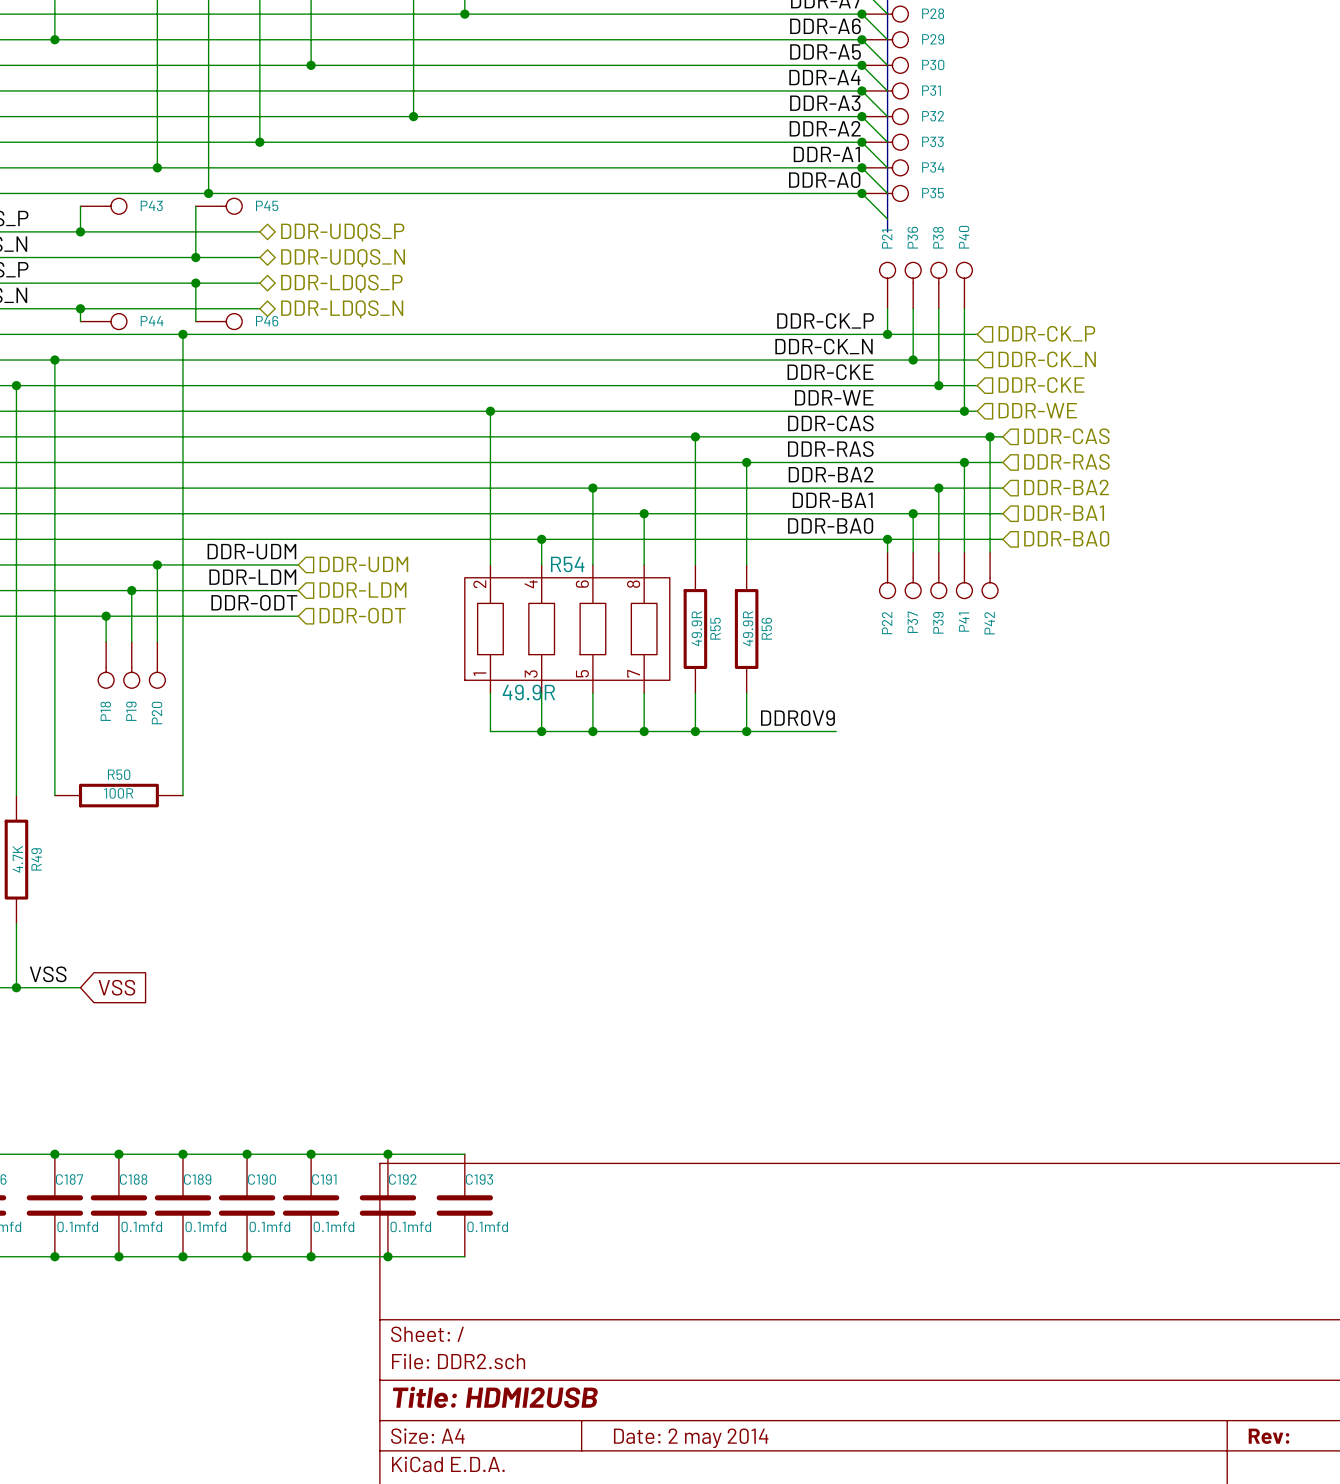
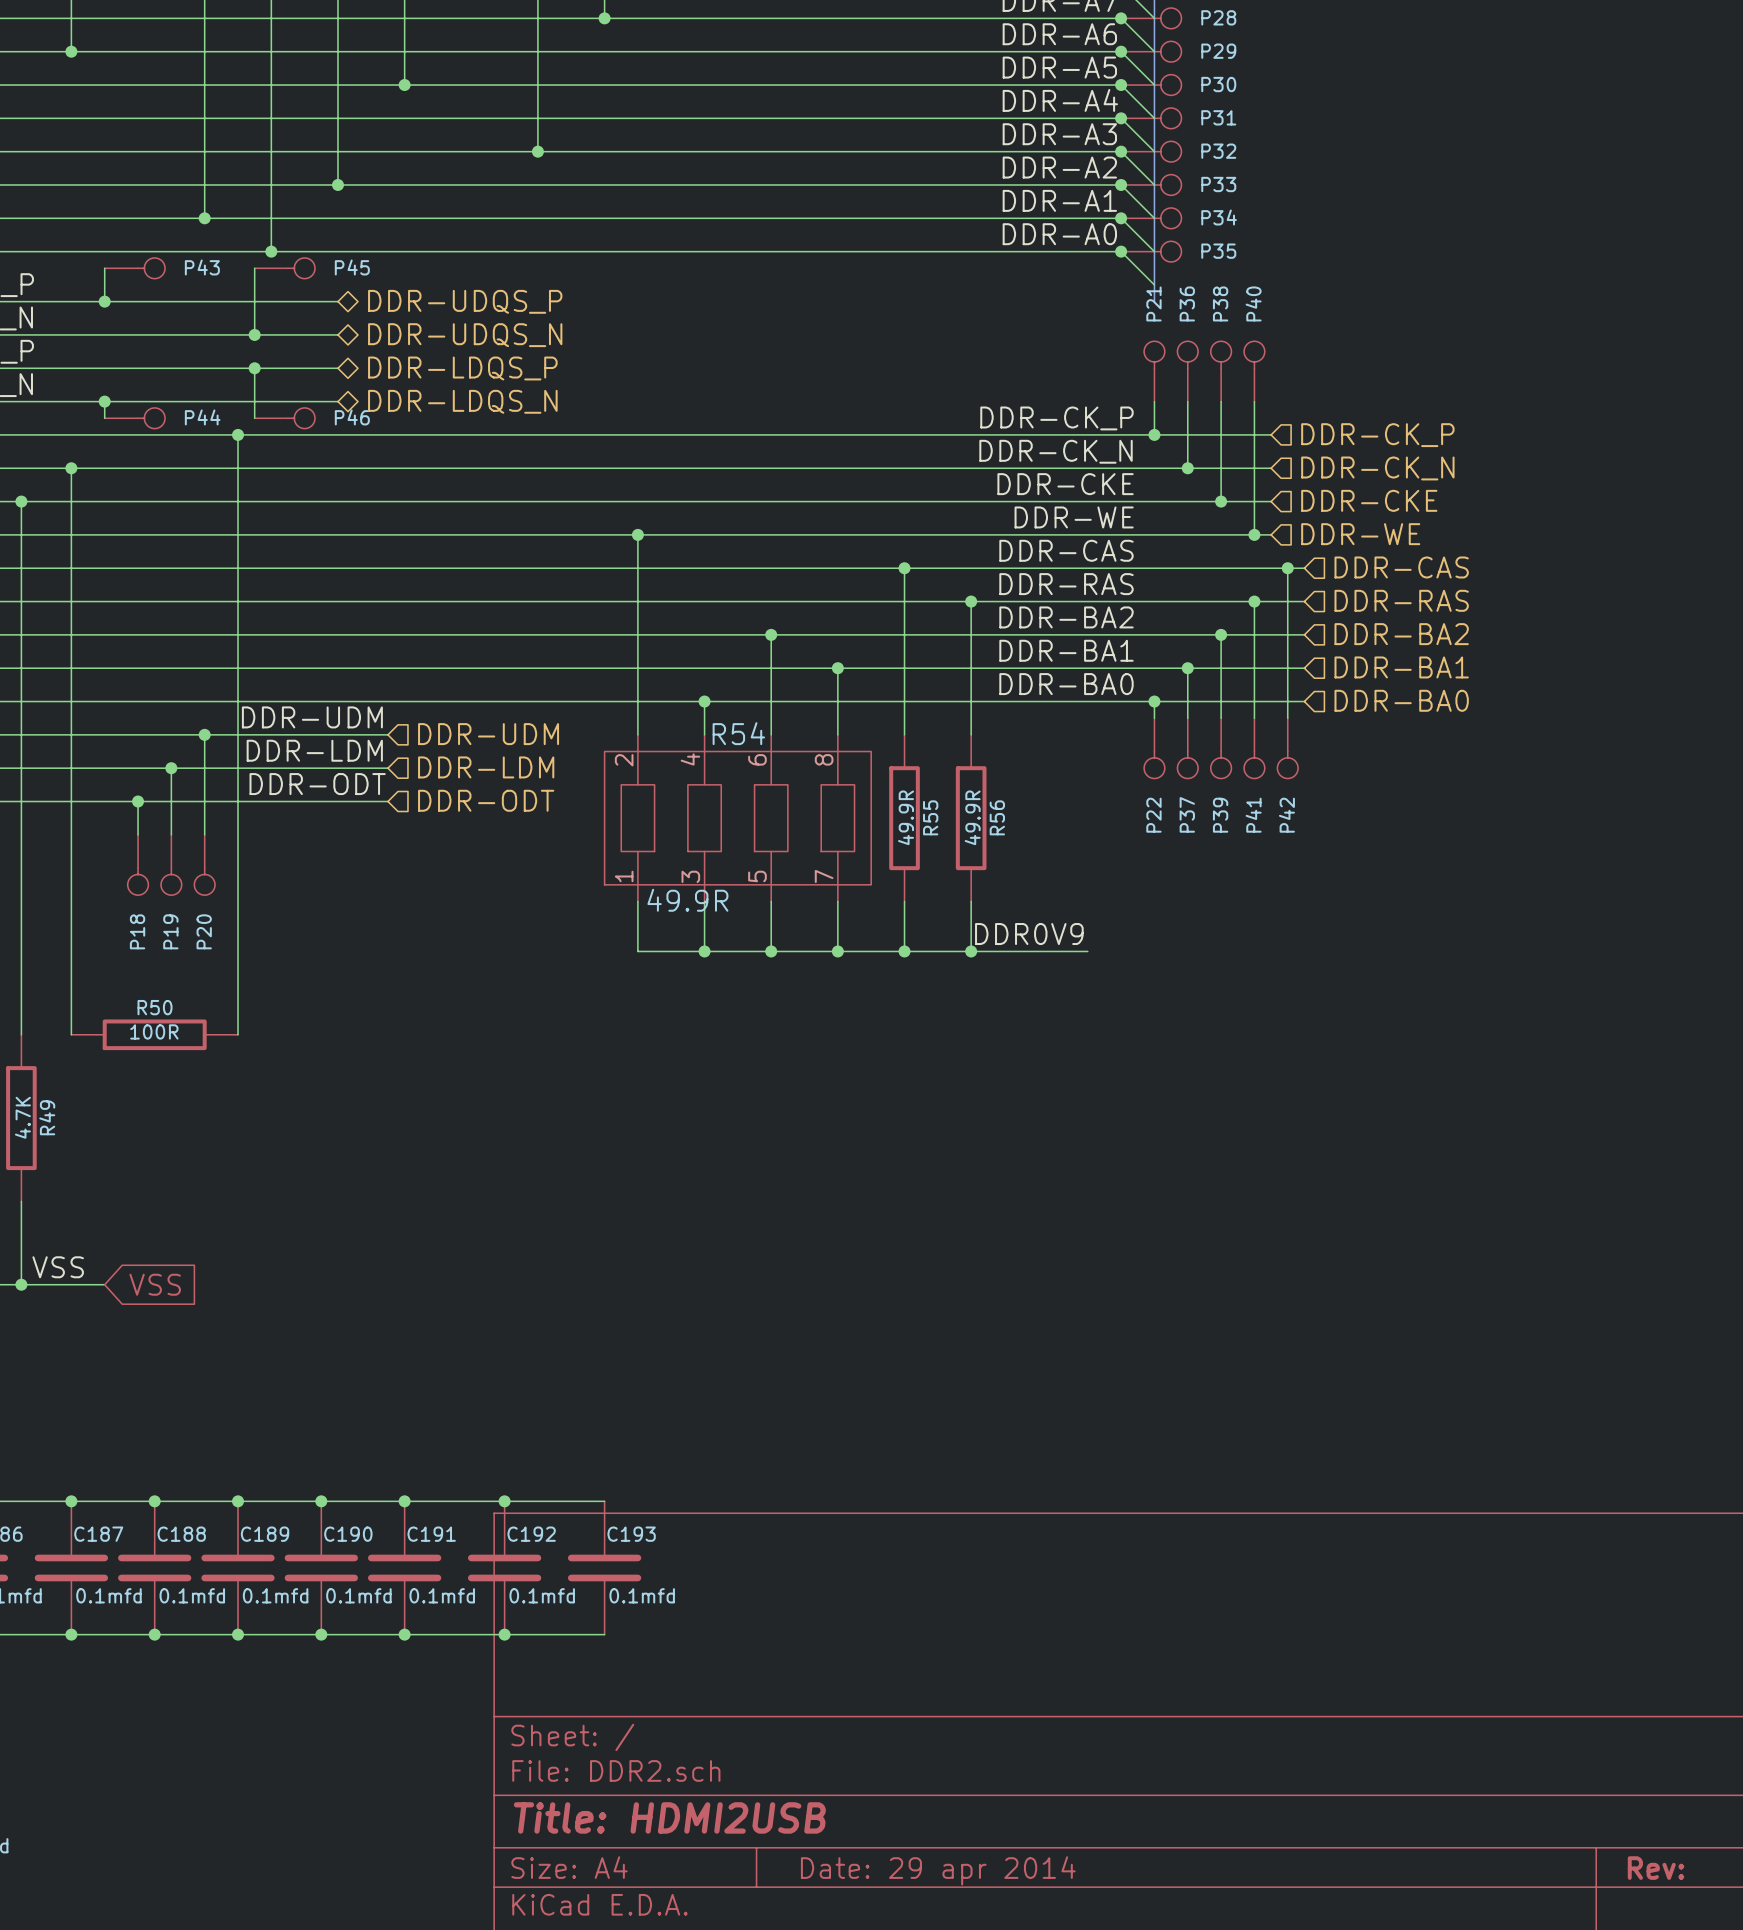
title block: Date: 2 may 2014 (691, 1438) -> Date: 29 apr 2014 (938, 1870)

